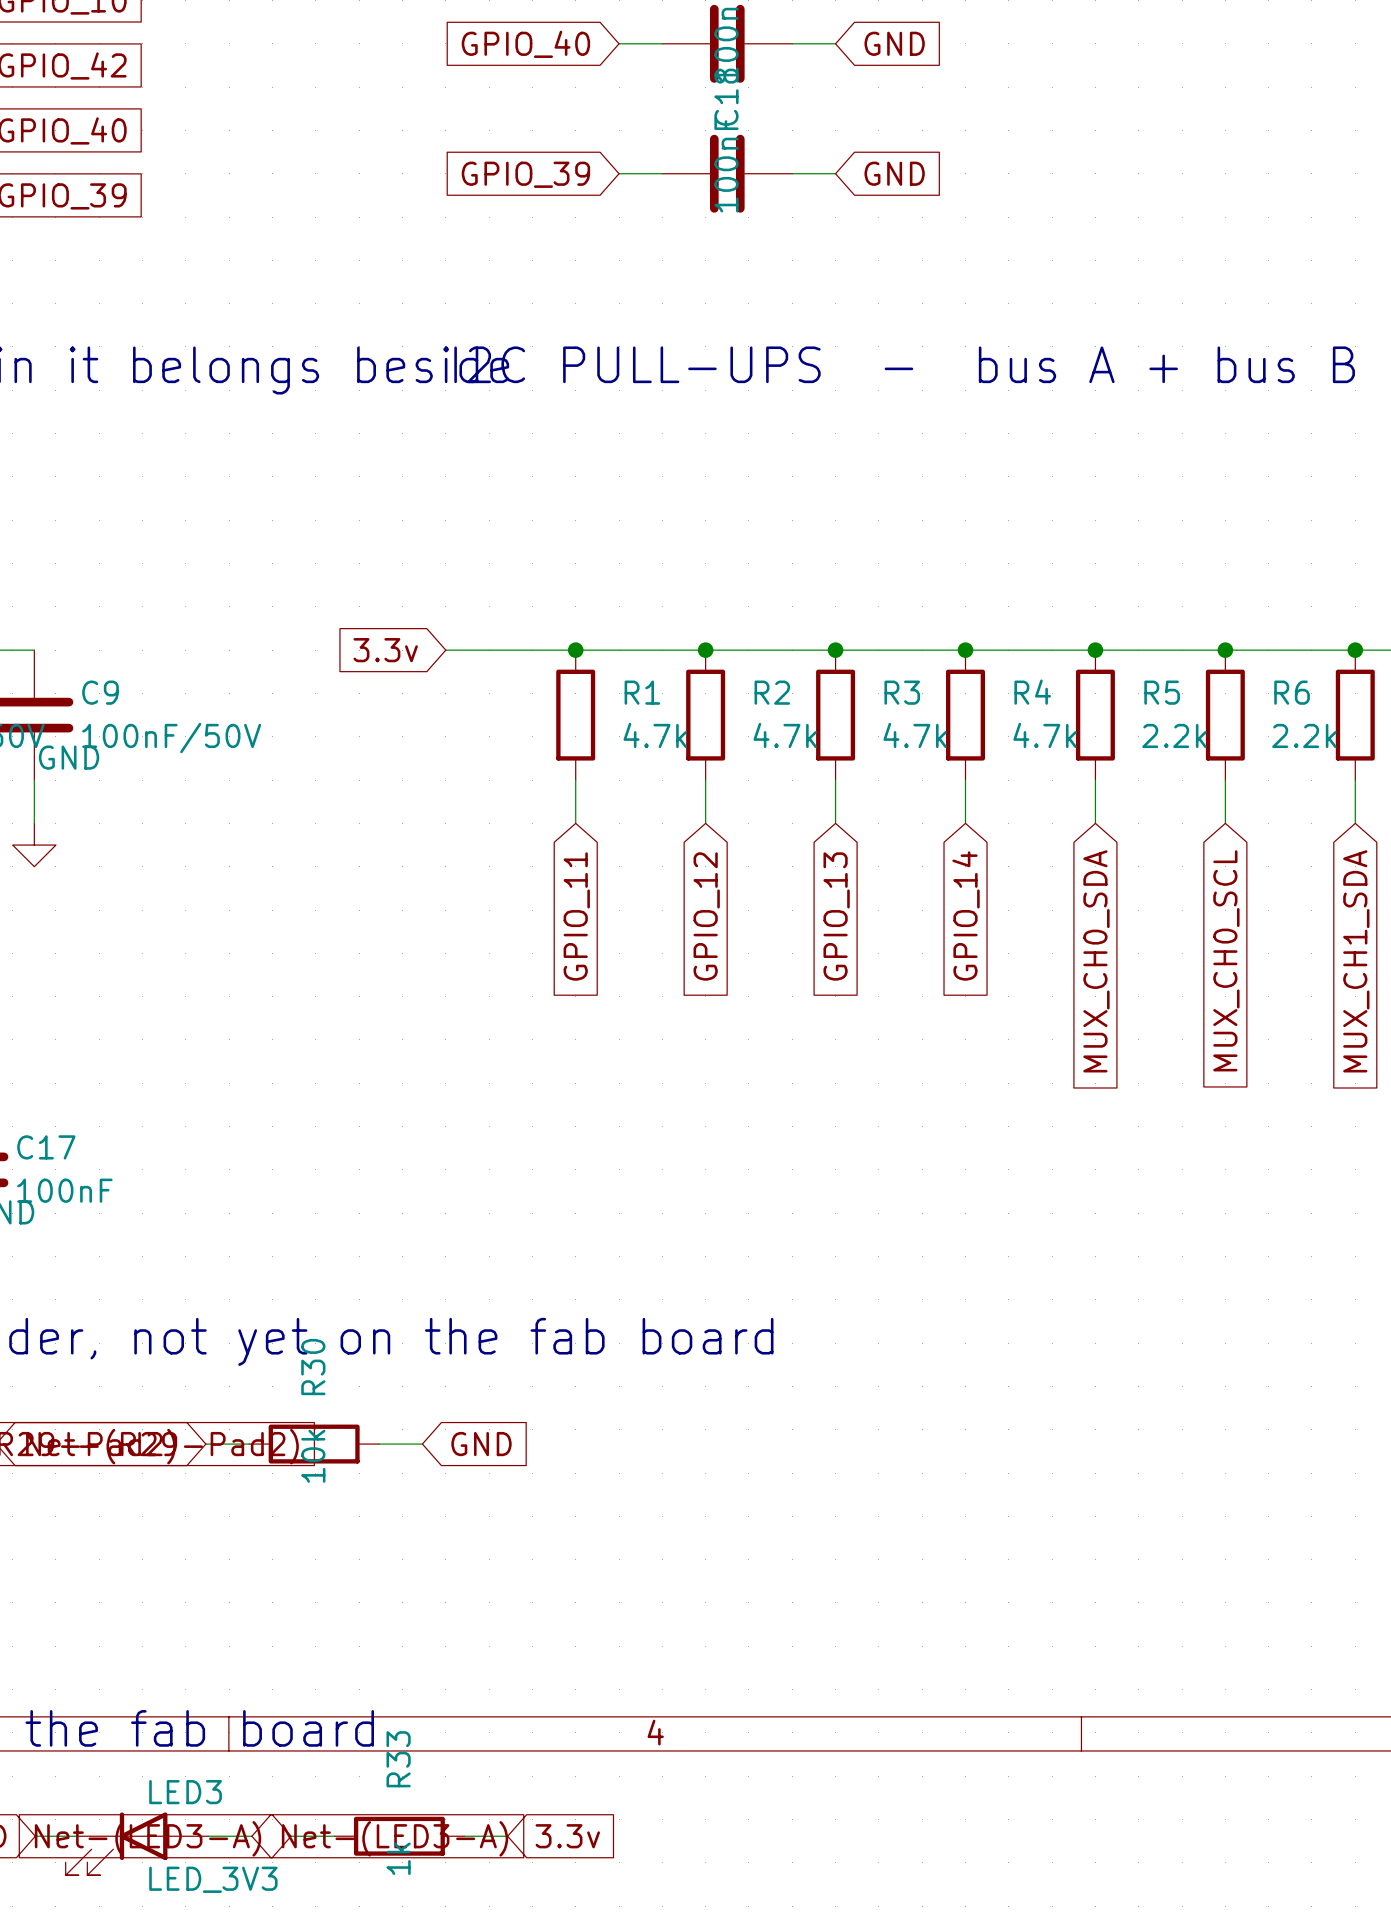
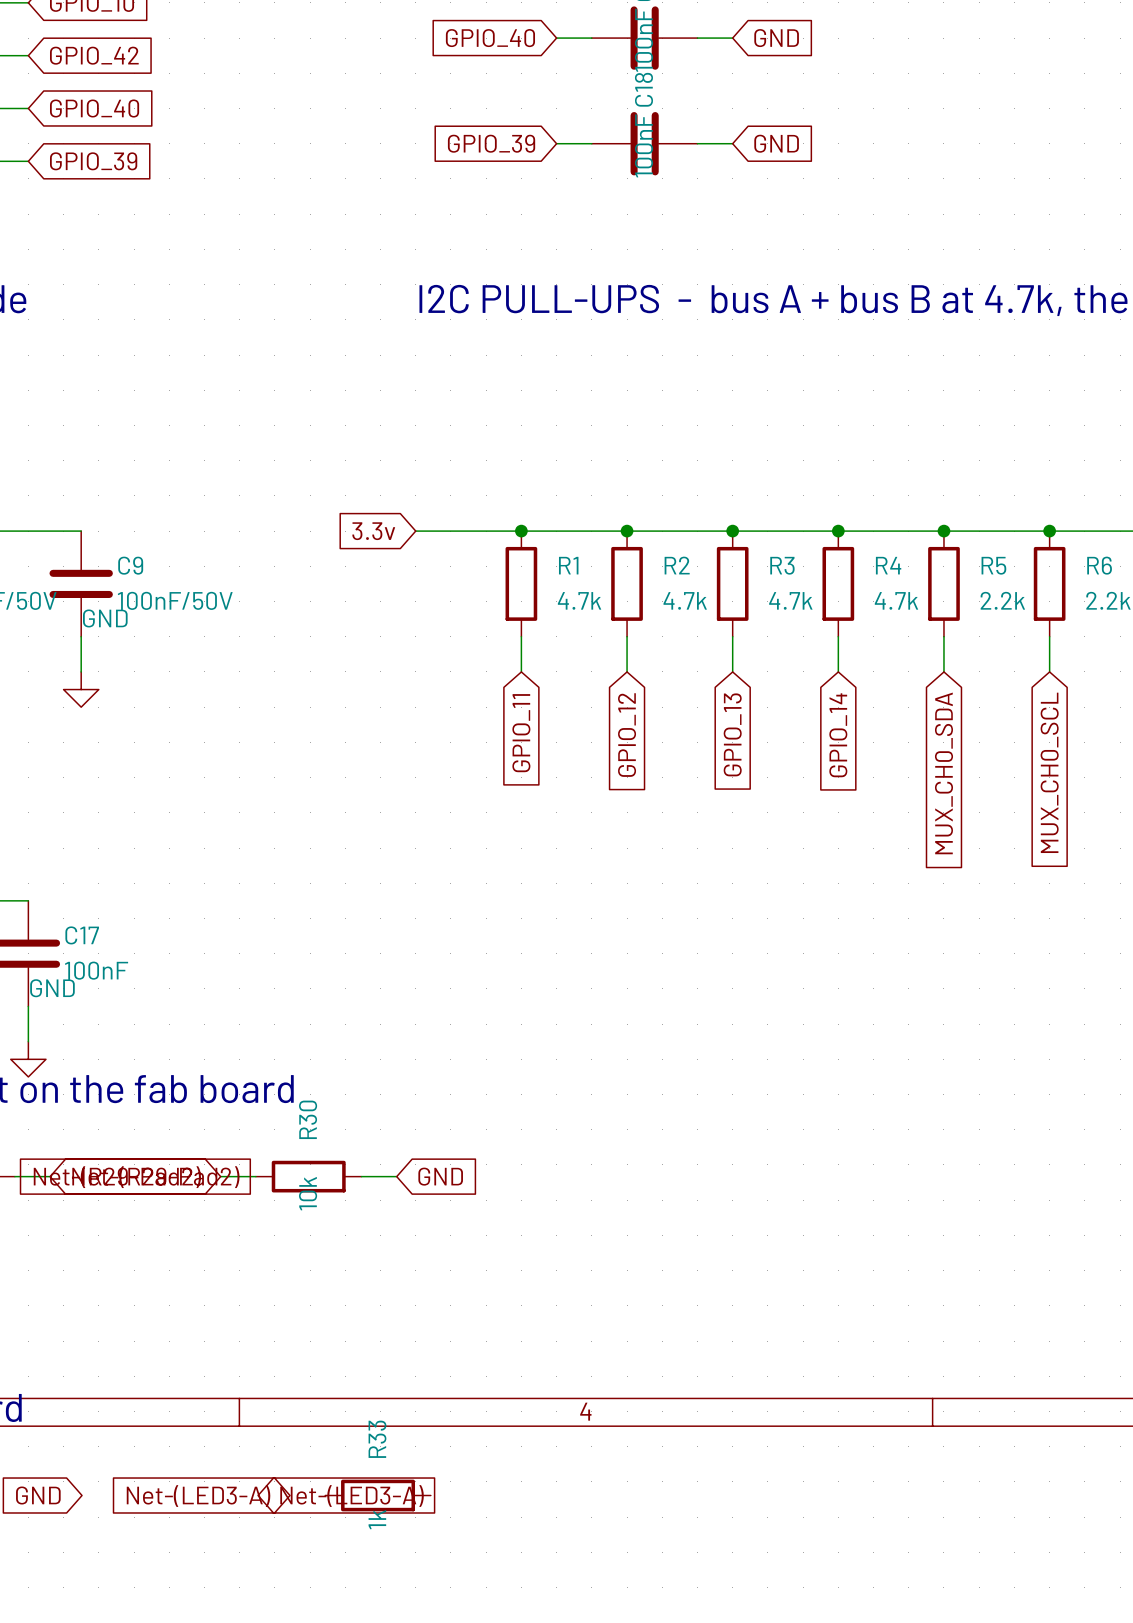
wire: (35, 1836) (78, 1836) -> none
wire: (208, 1836) (251, 1836) -> none
wire: (291, 1836) (334, 1836) -> none
wire: (464, 1836) (507, 1836) -> none
global label: 3.3v (567, 1836) -> none
LED3: LED_3V3 (137, 1843) -> none

